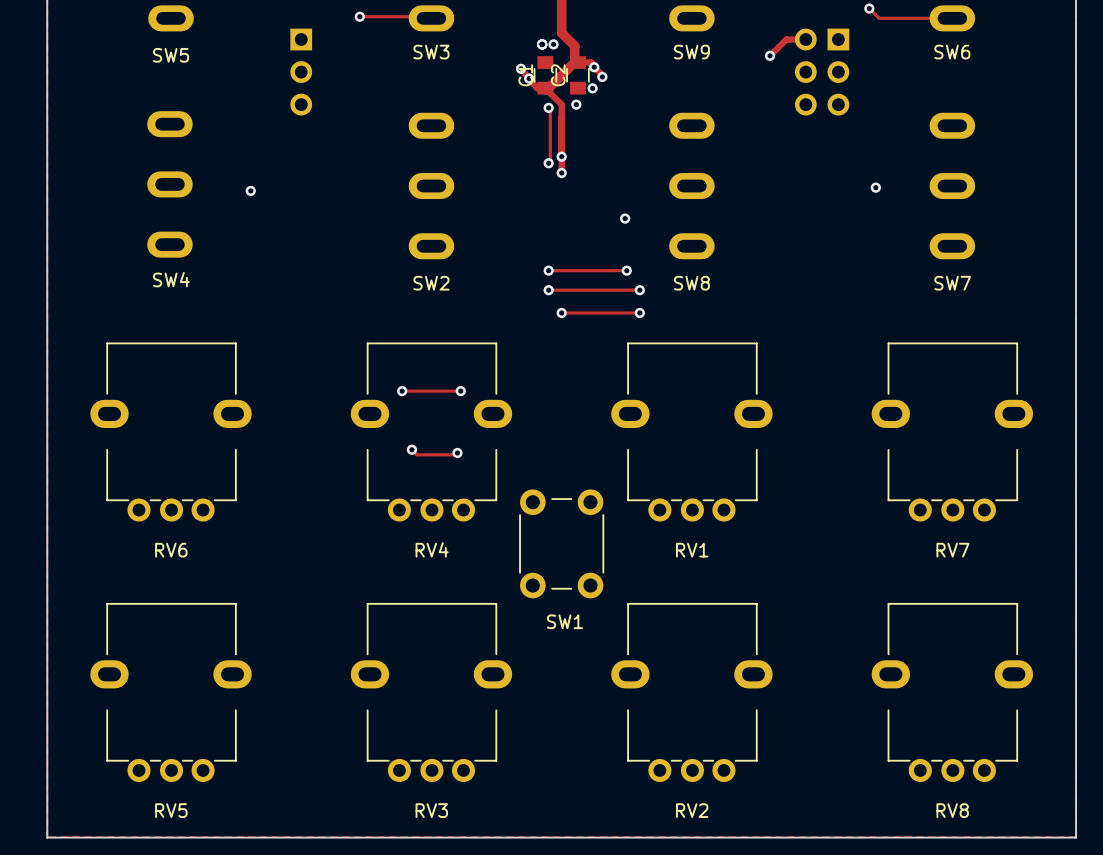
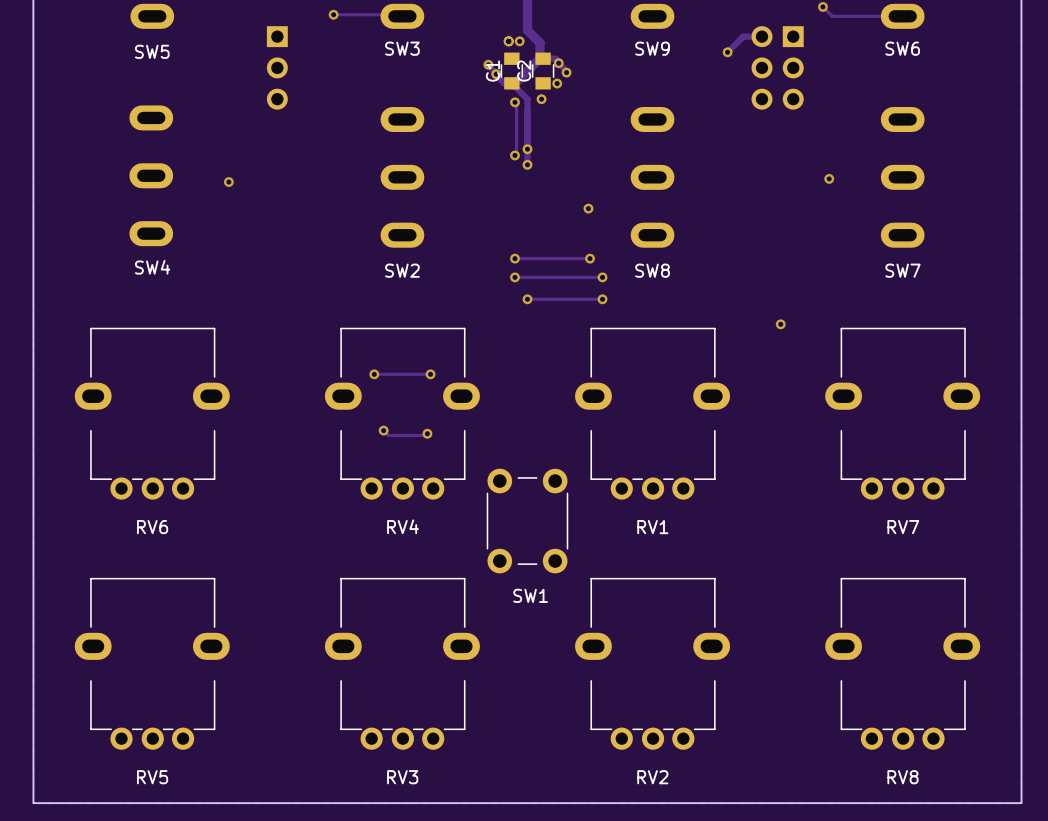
via: none -> (780, 324)

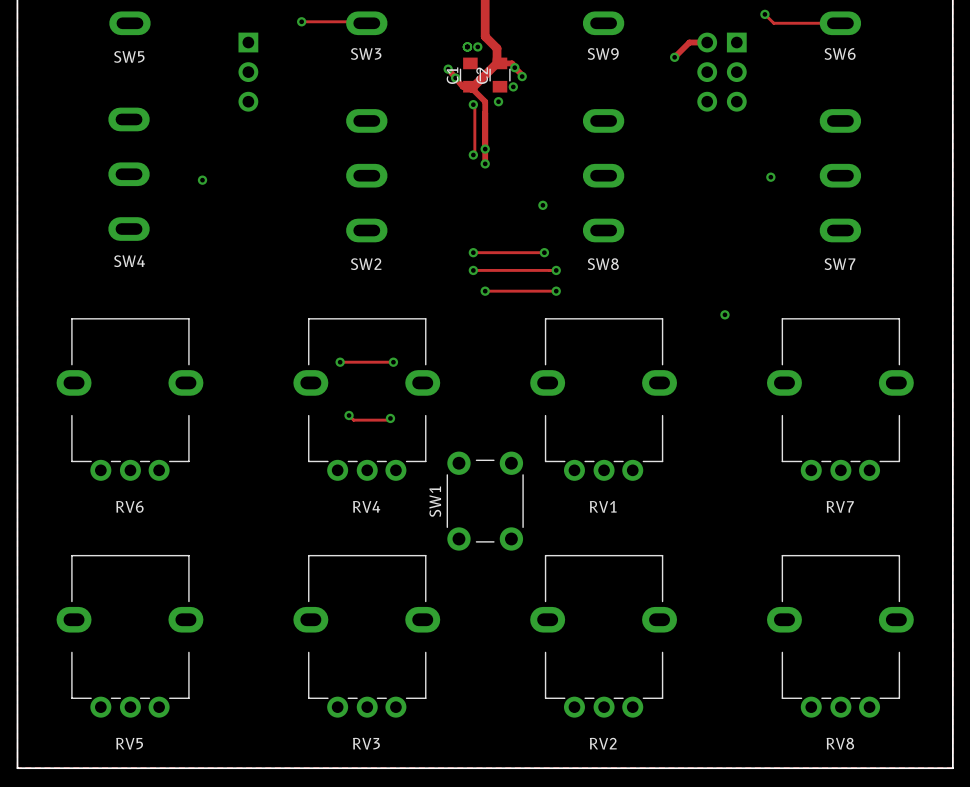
SW1 name rotation: 0° (530, 595) -> 90° counterclockwise (435, 501)
SW1 name position: SW1 (530, 595) -> SW1 (435, 501)

